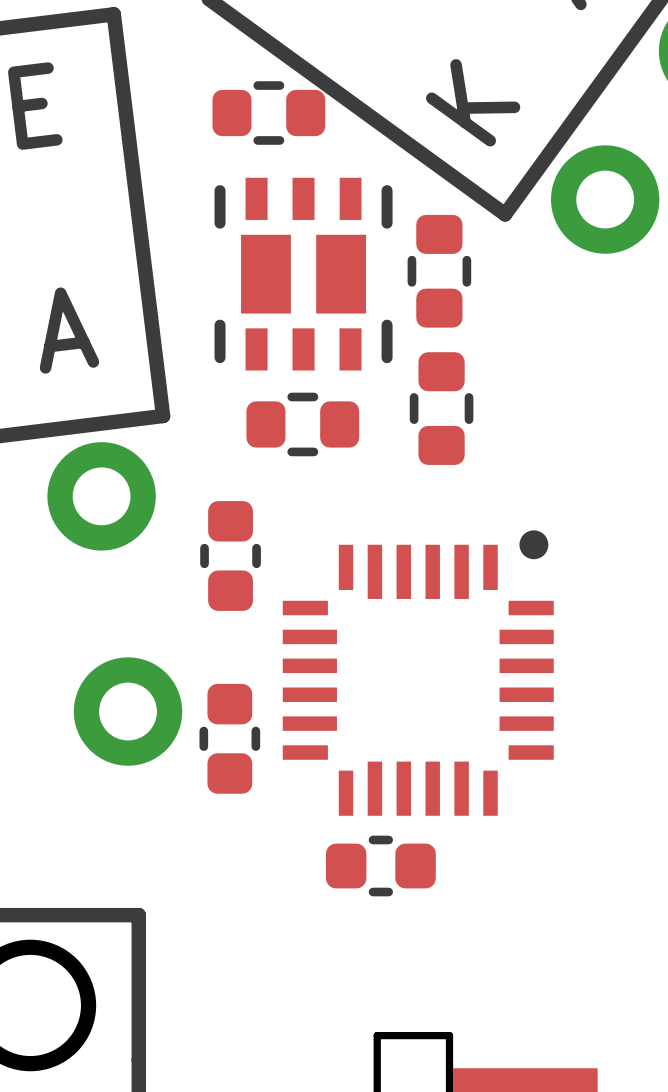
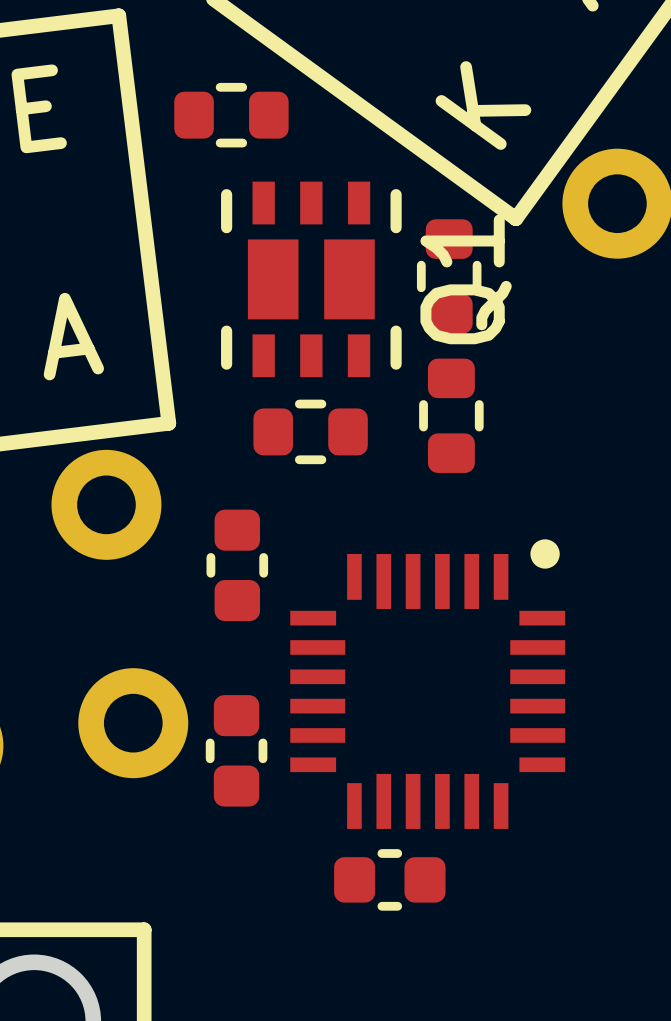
part position: (268, 113) -> (231, 115)
Q1 name: none -> Q1 (466, 279)

